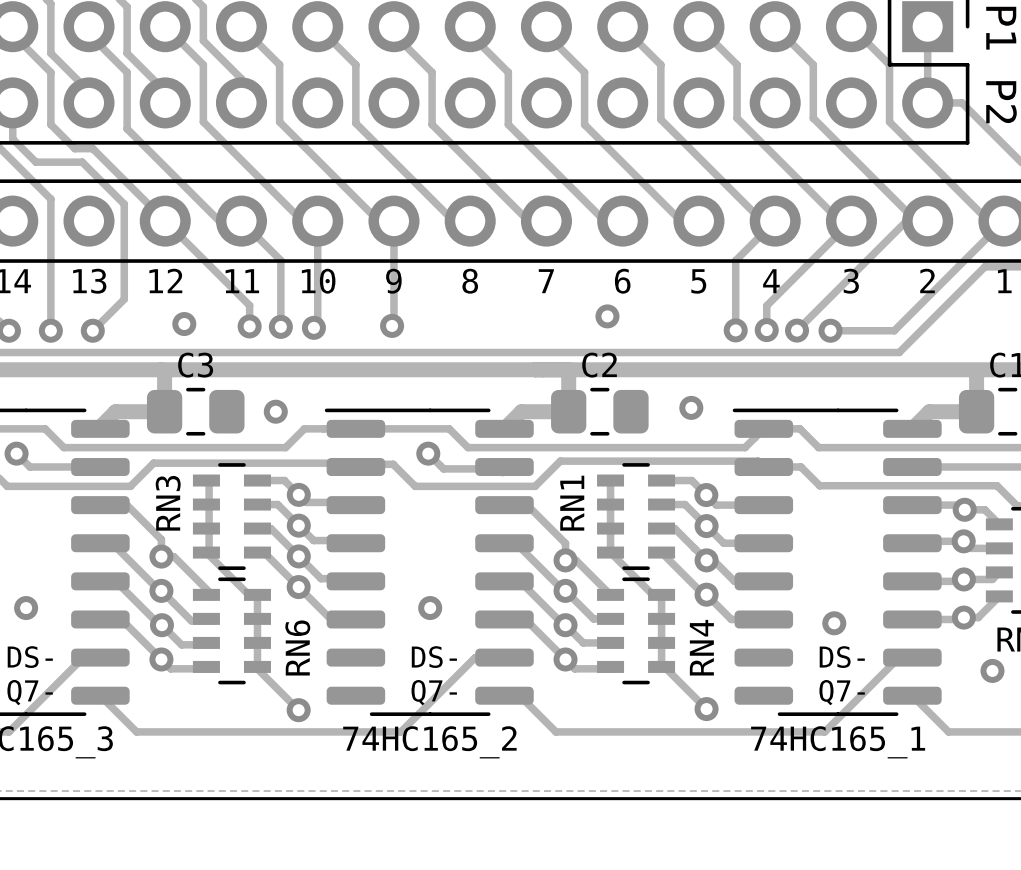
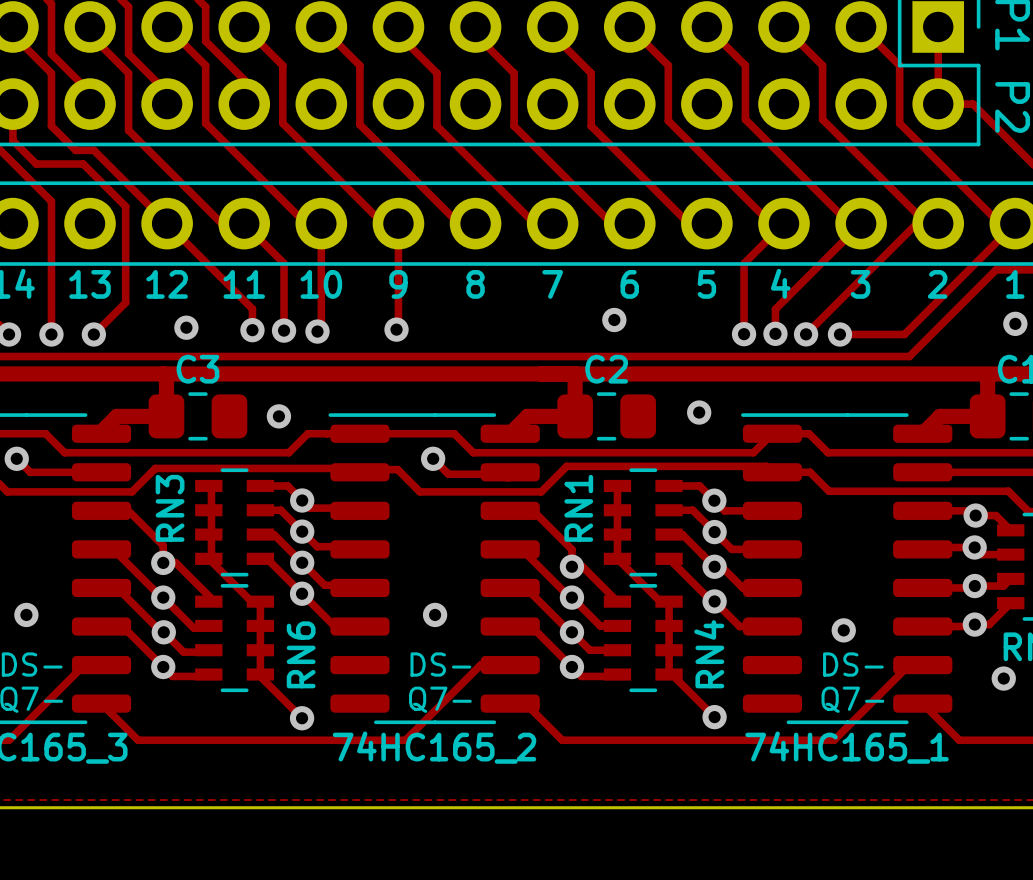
via: none -> (1015, 323)

